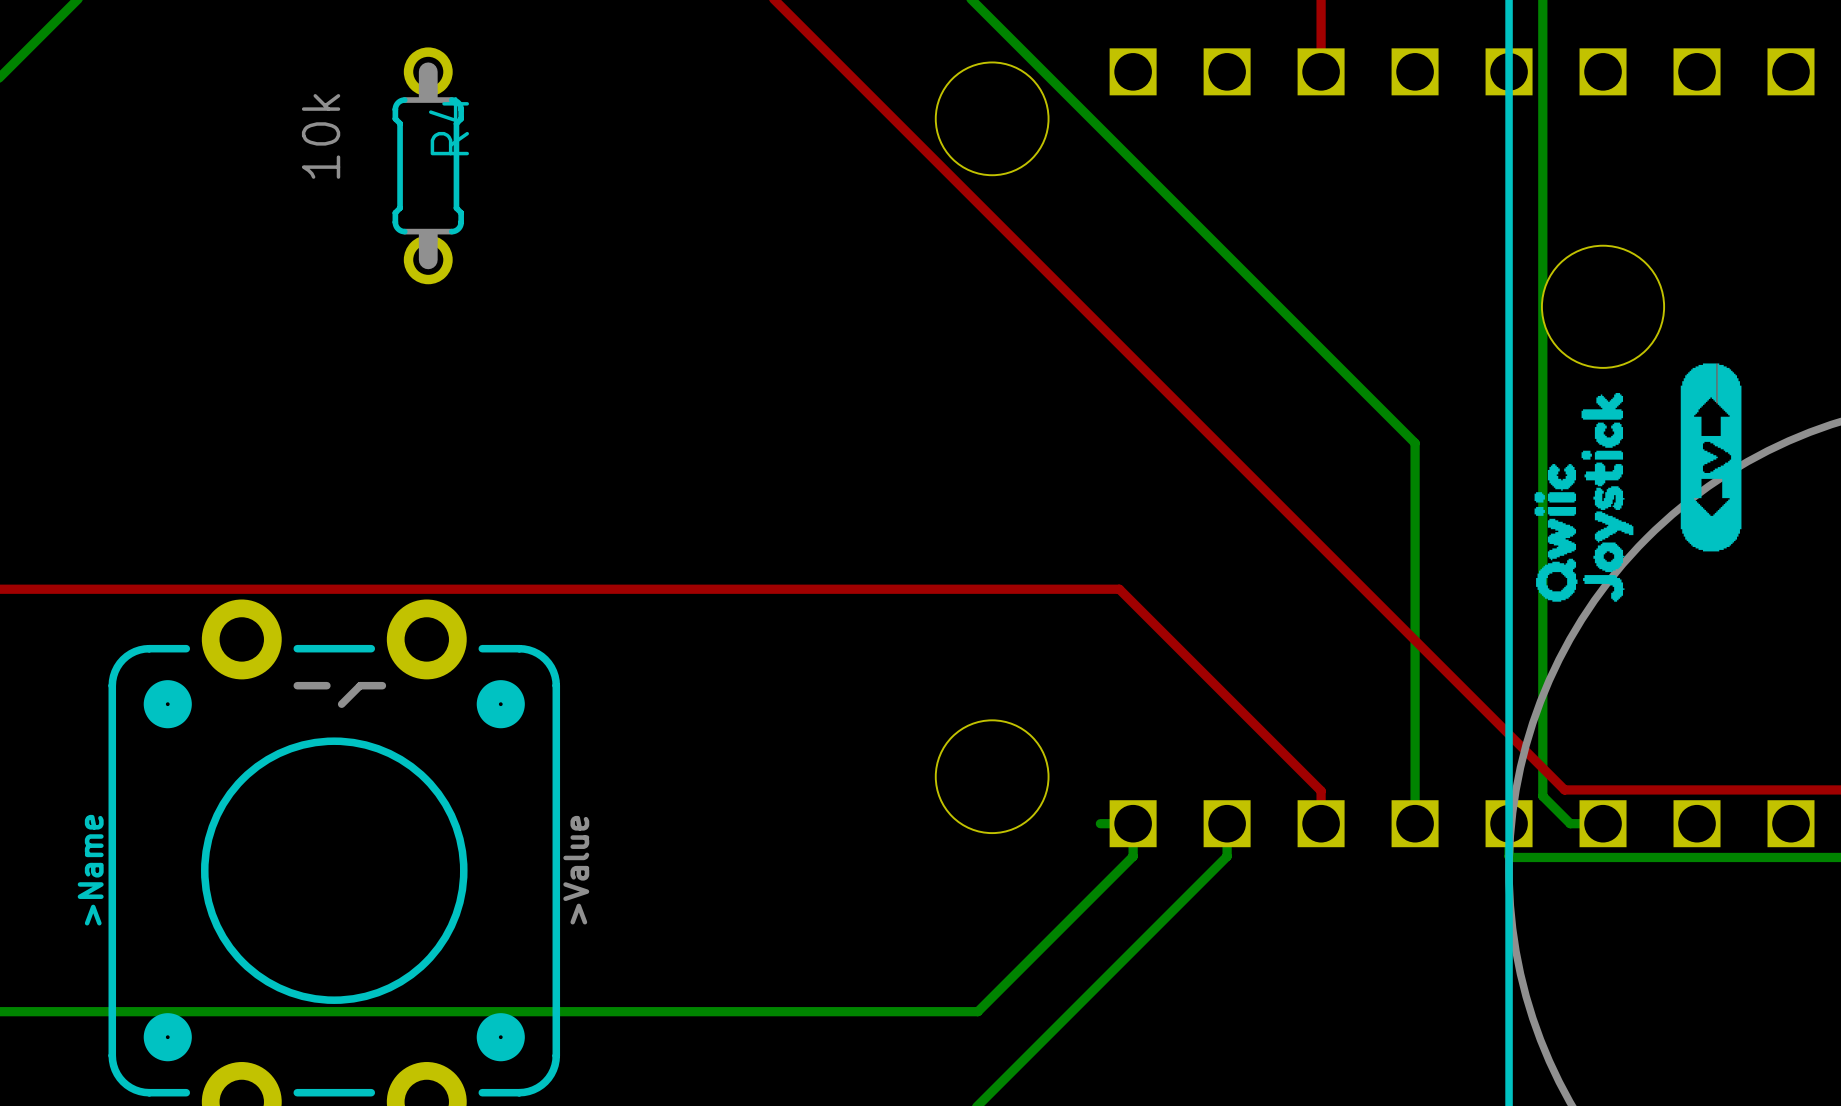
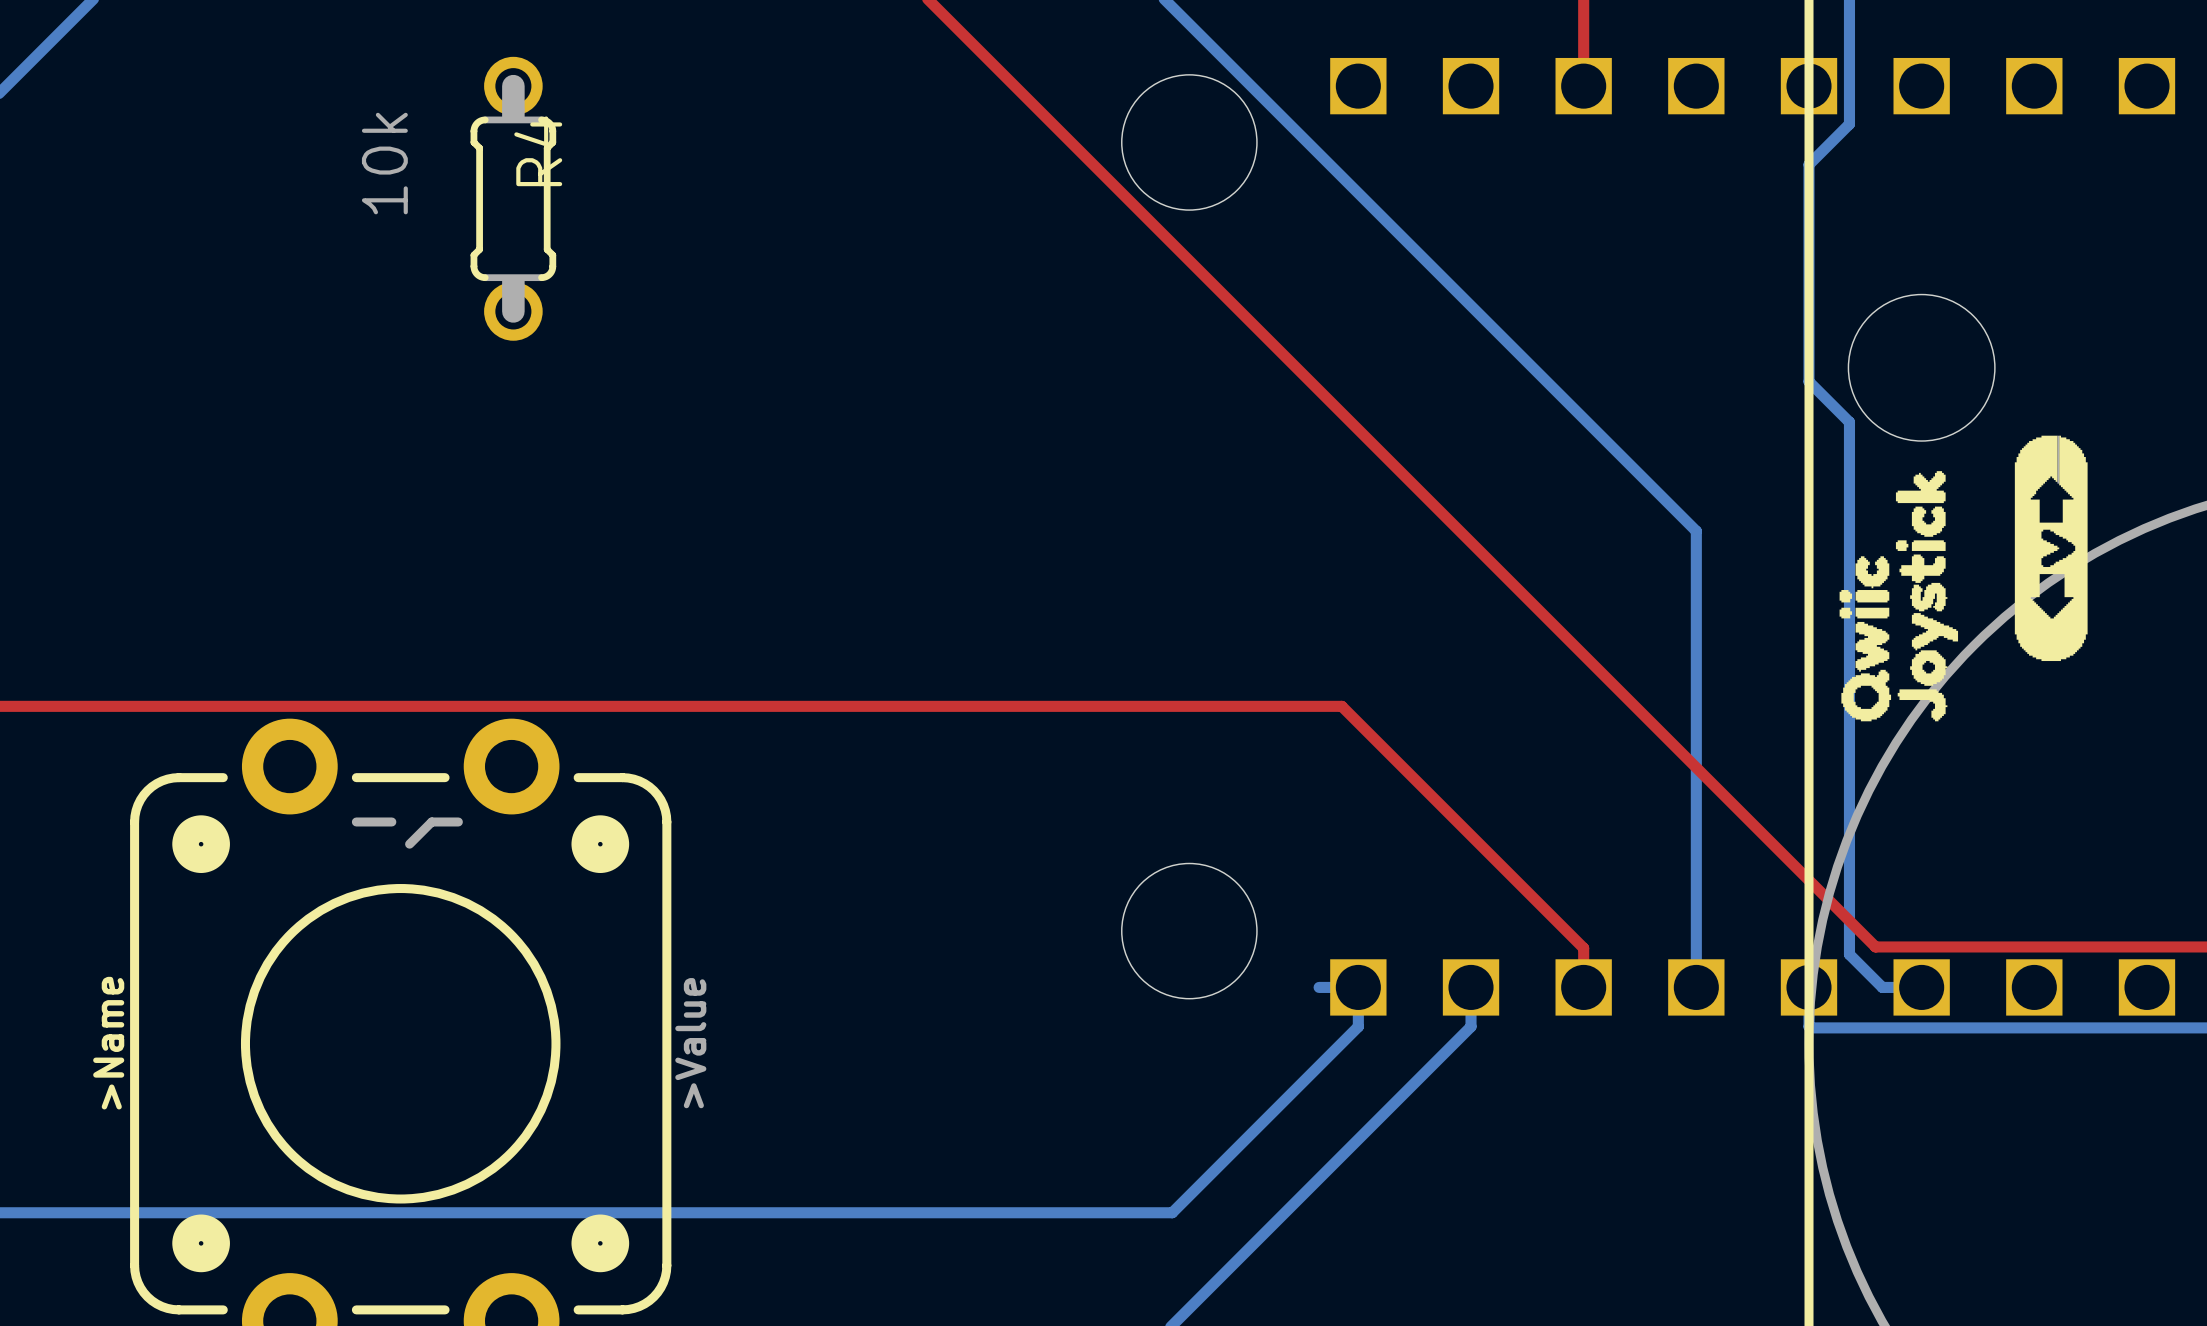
bottom track: (1542, 103) (1542, 352) -> (1849, 124) (1809, 164) (1809, 381) (1849, 422)

